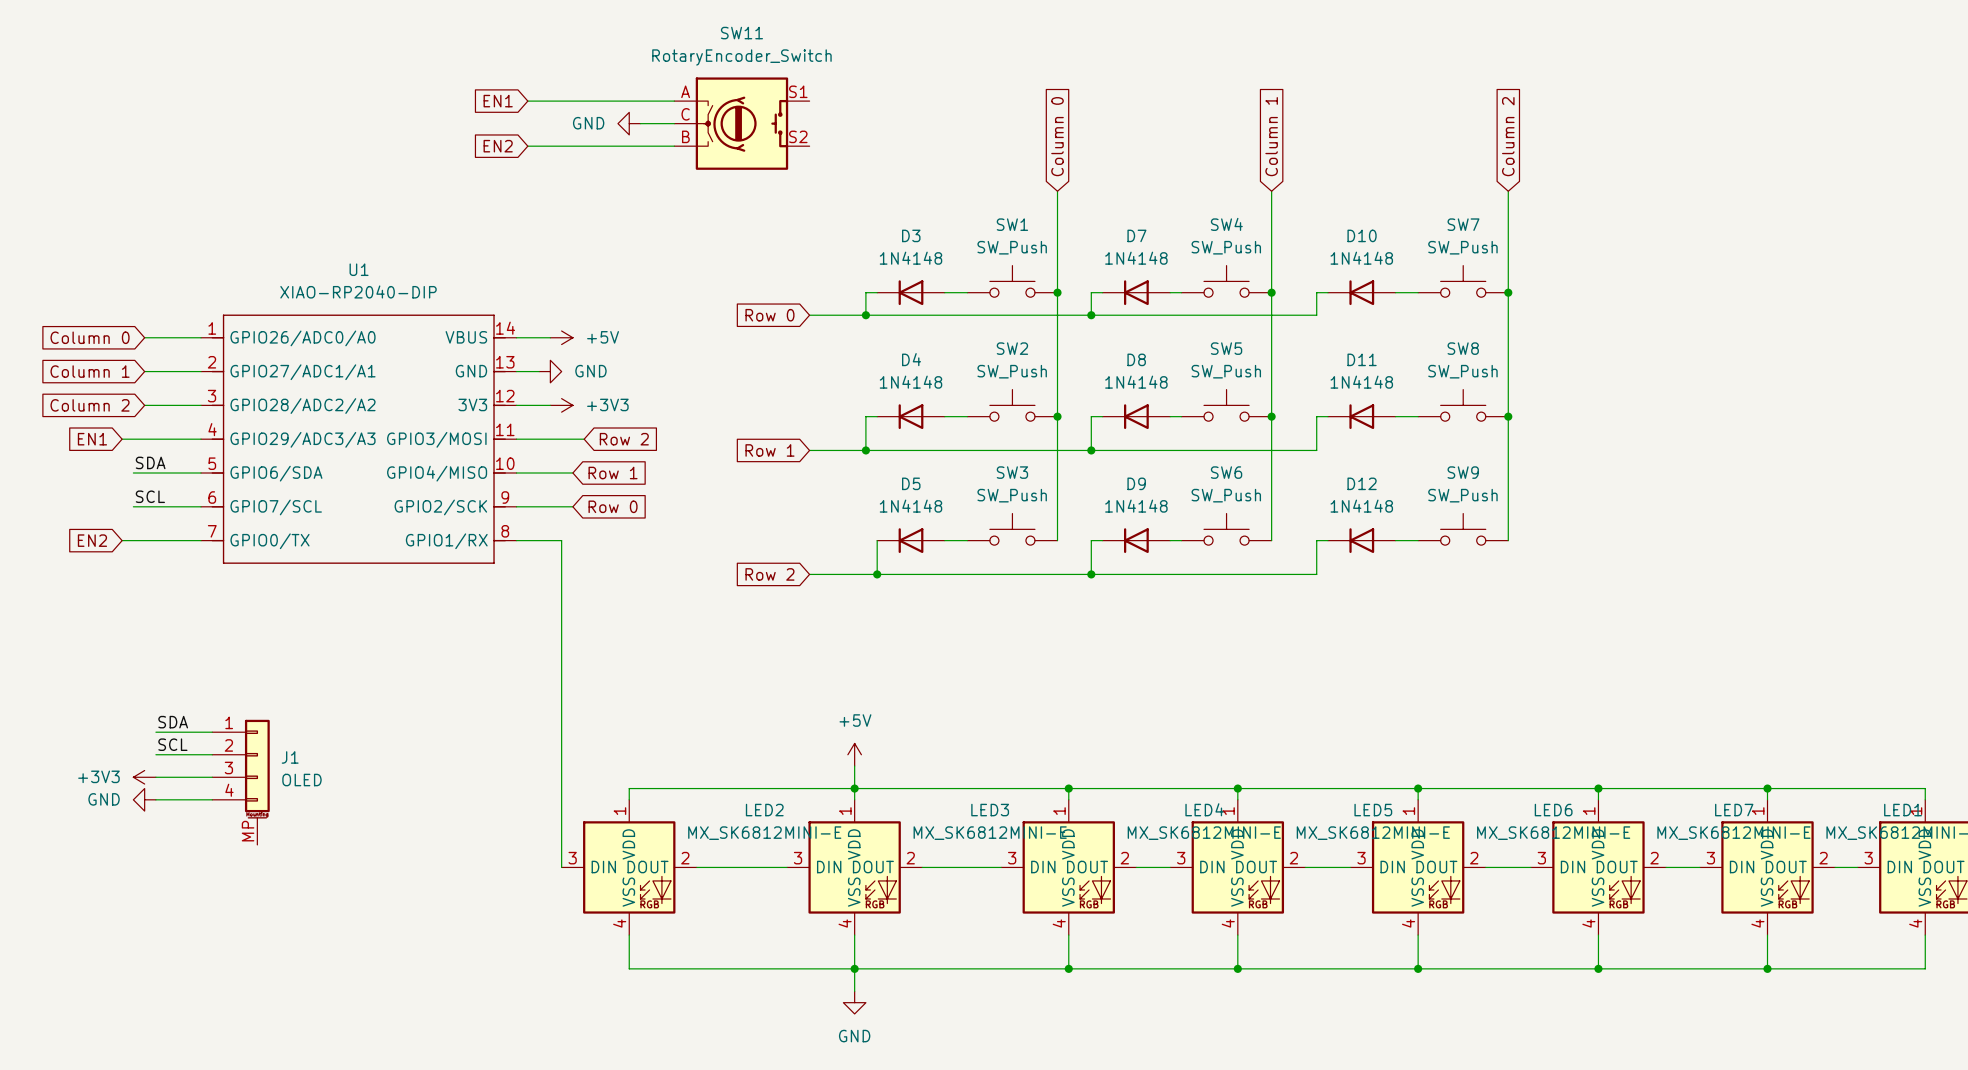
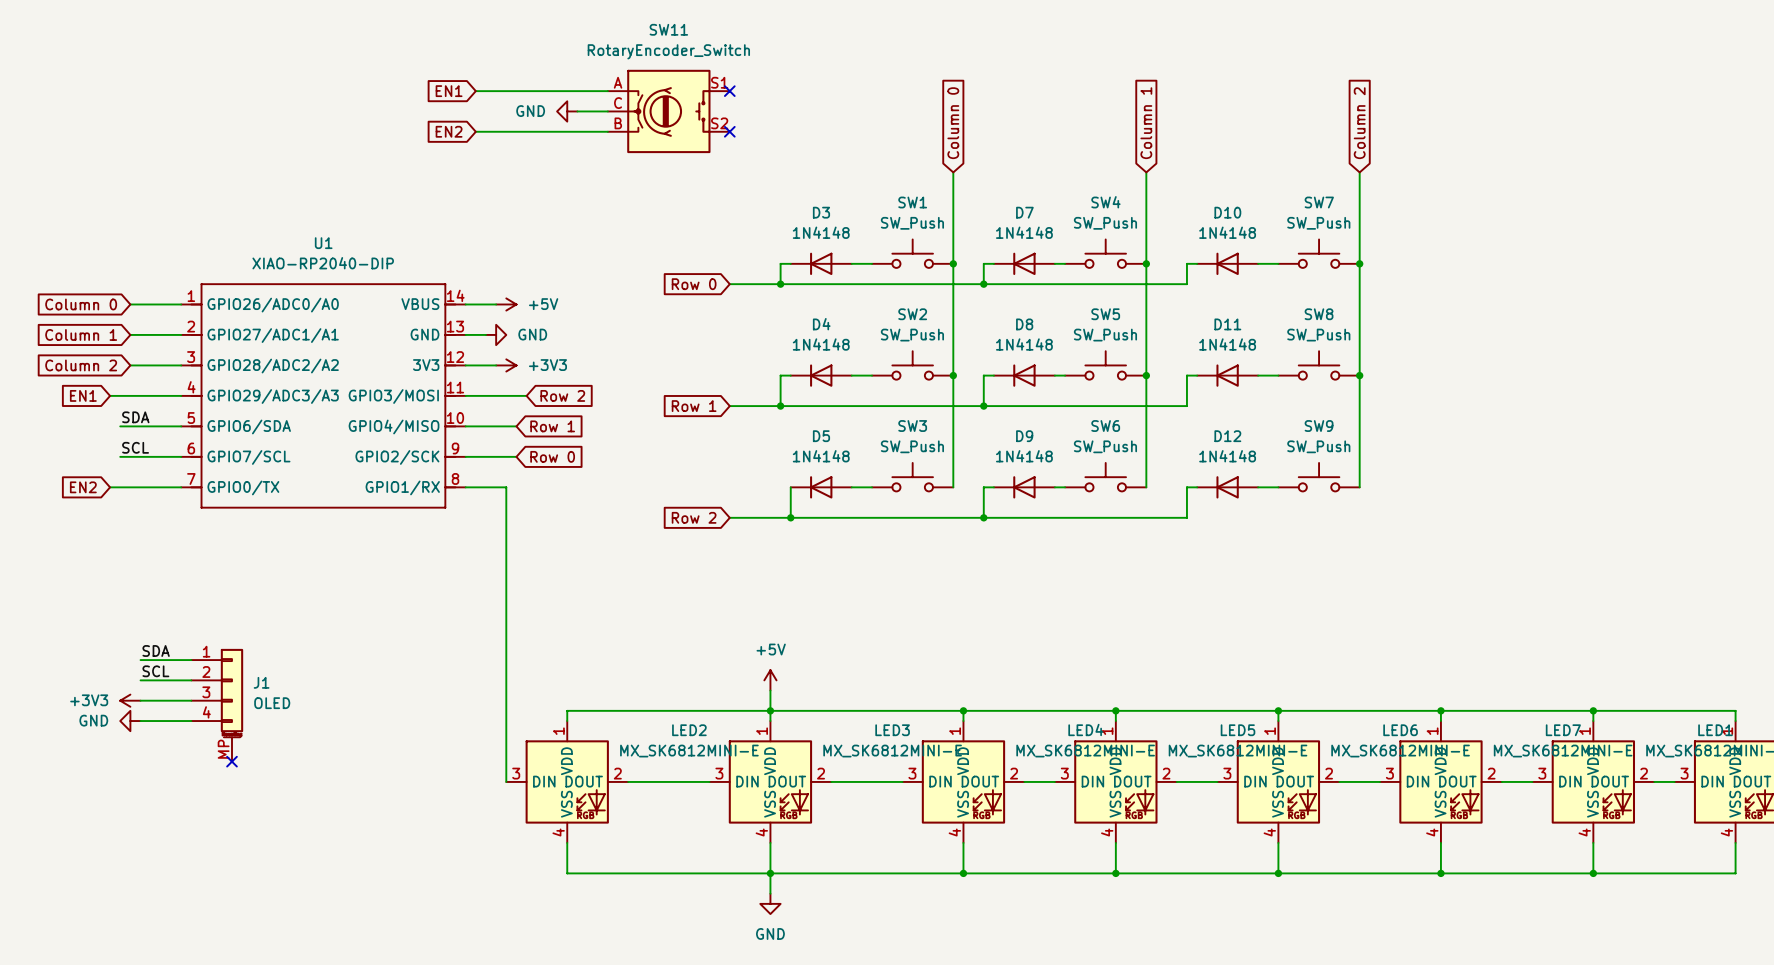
no-connect mark: none -> (729, 91)
no-connect mark: none -> (729, 131)
no-connect mark: none -> (231, 761)

